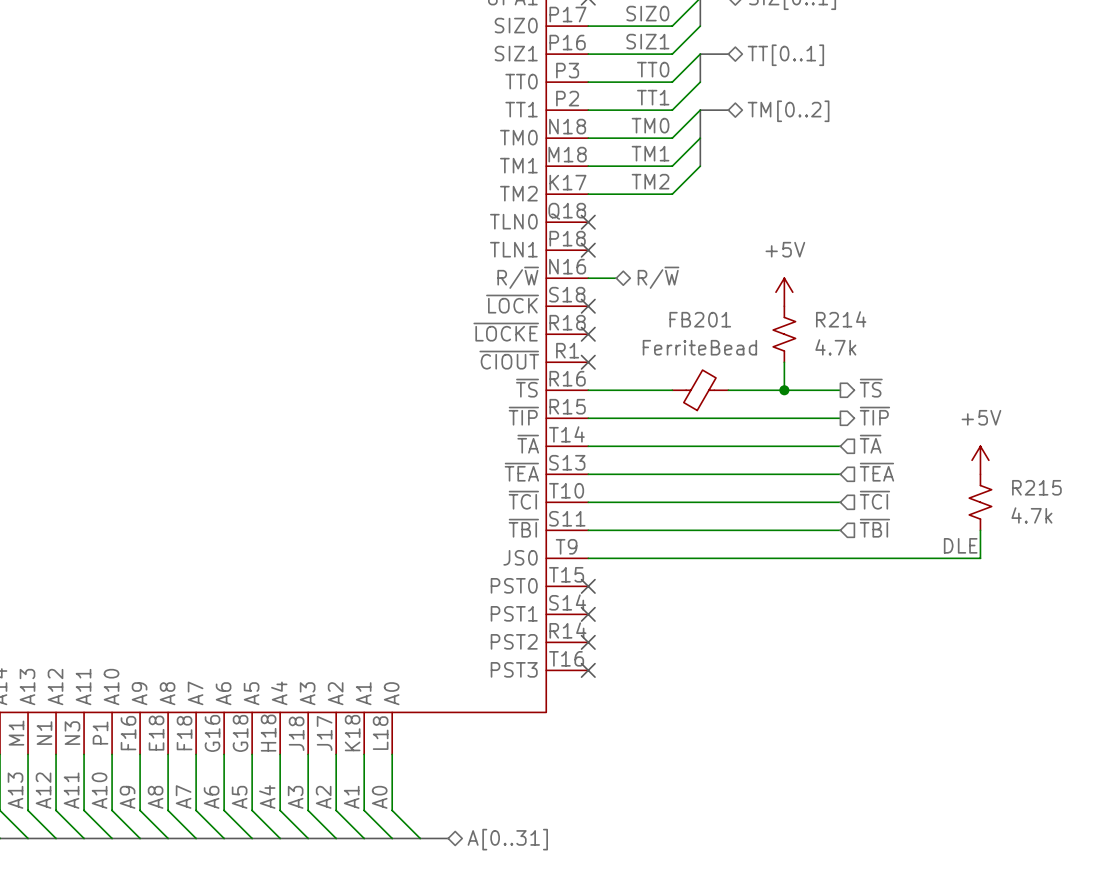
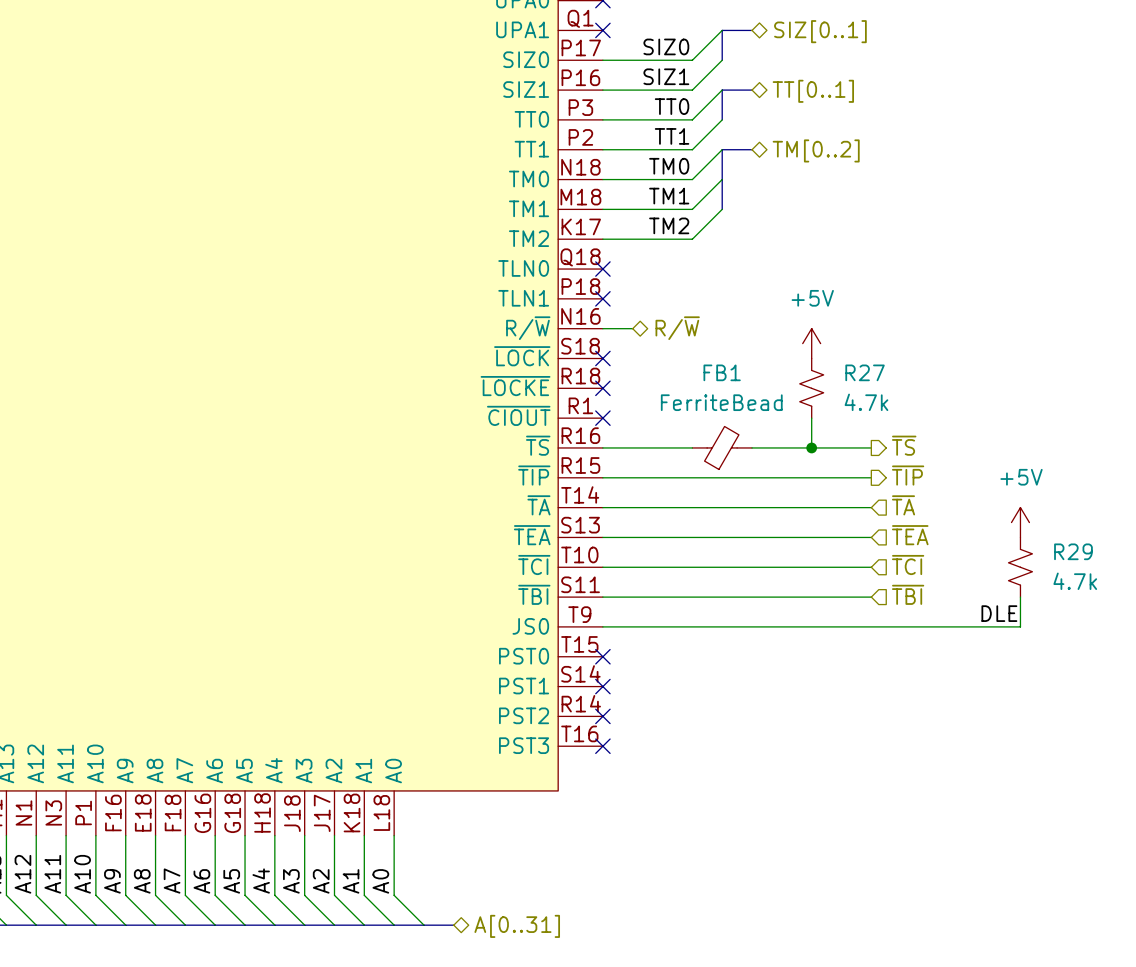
FB201 name: FB201 (700, 319) -> FB1 (722, 372)
R214 name: R214 (841, 319) -> R27 (865, 372)
R215 name: R215 (1036, 487) -> R29 (1073, 551)

